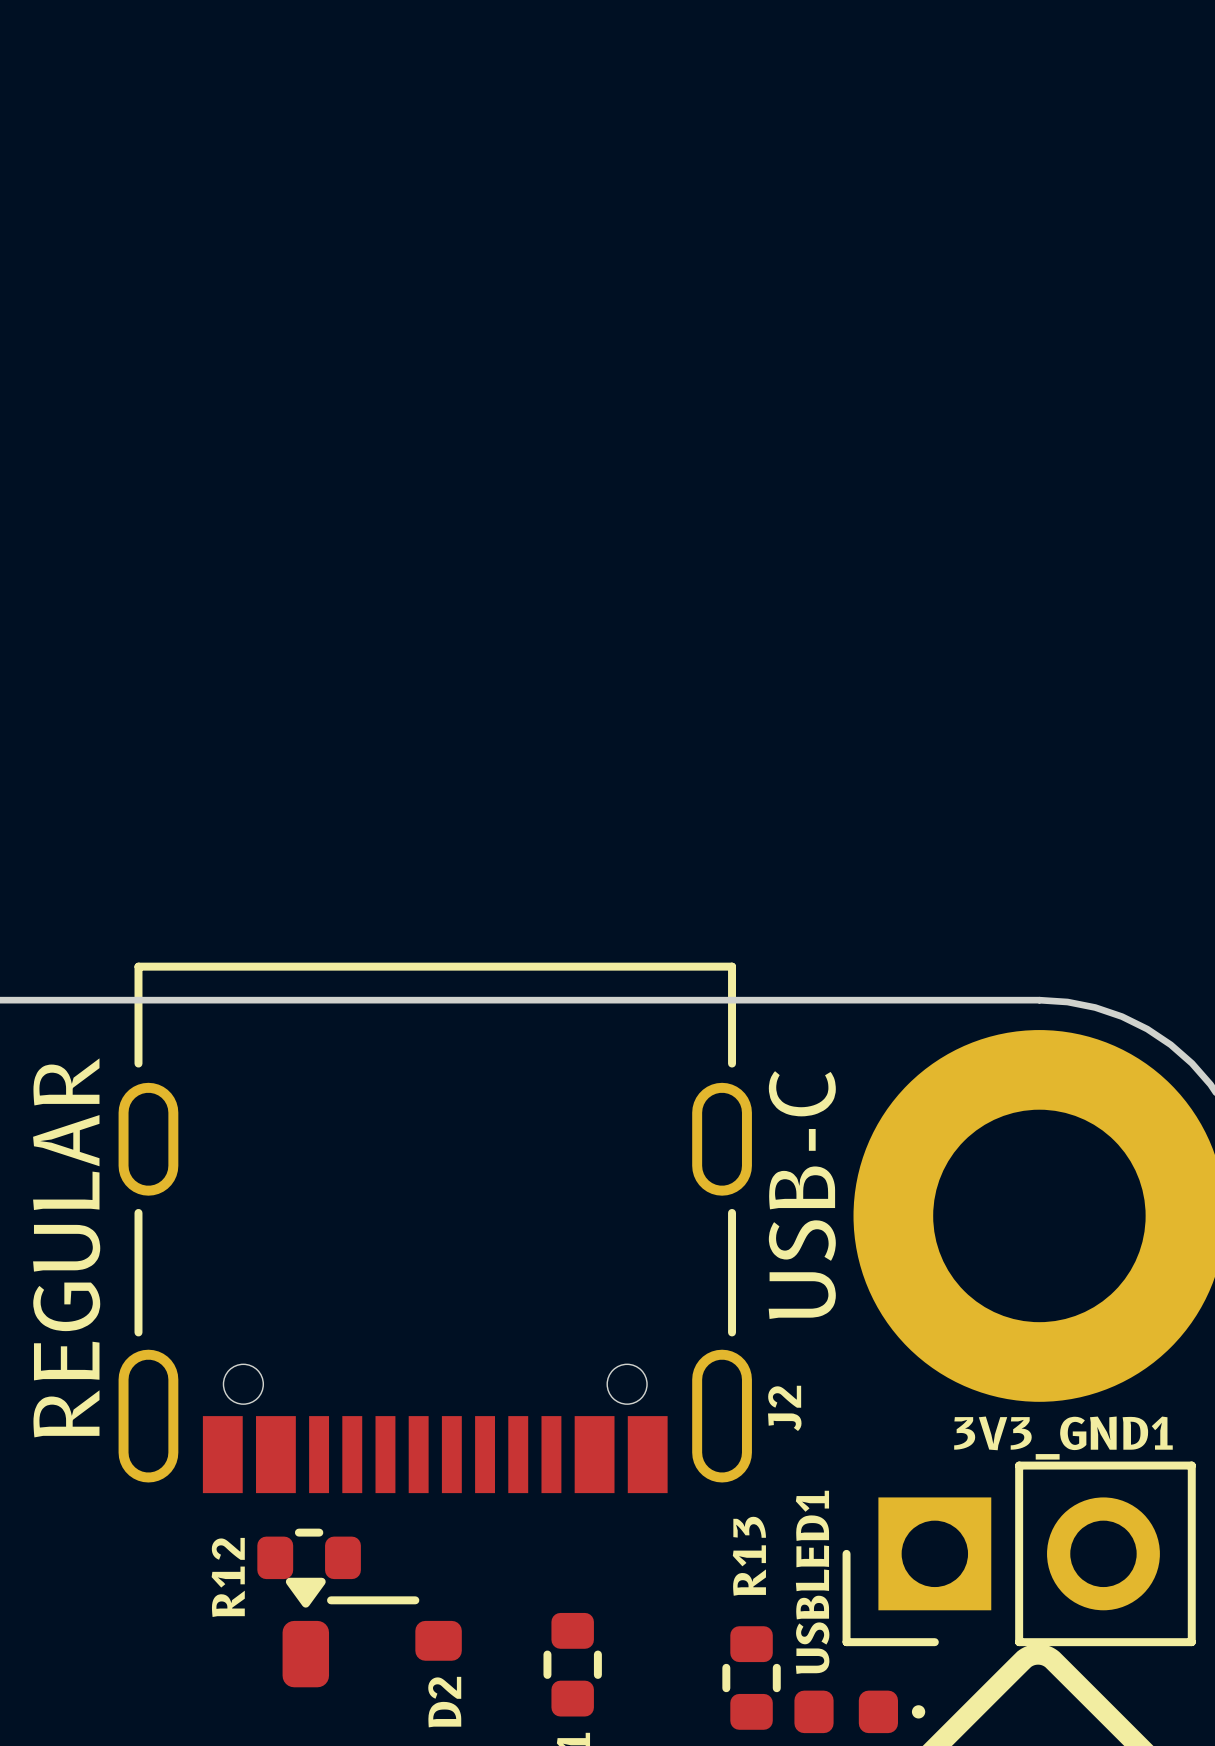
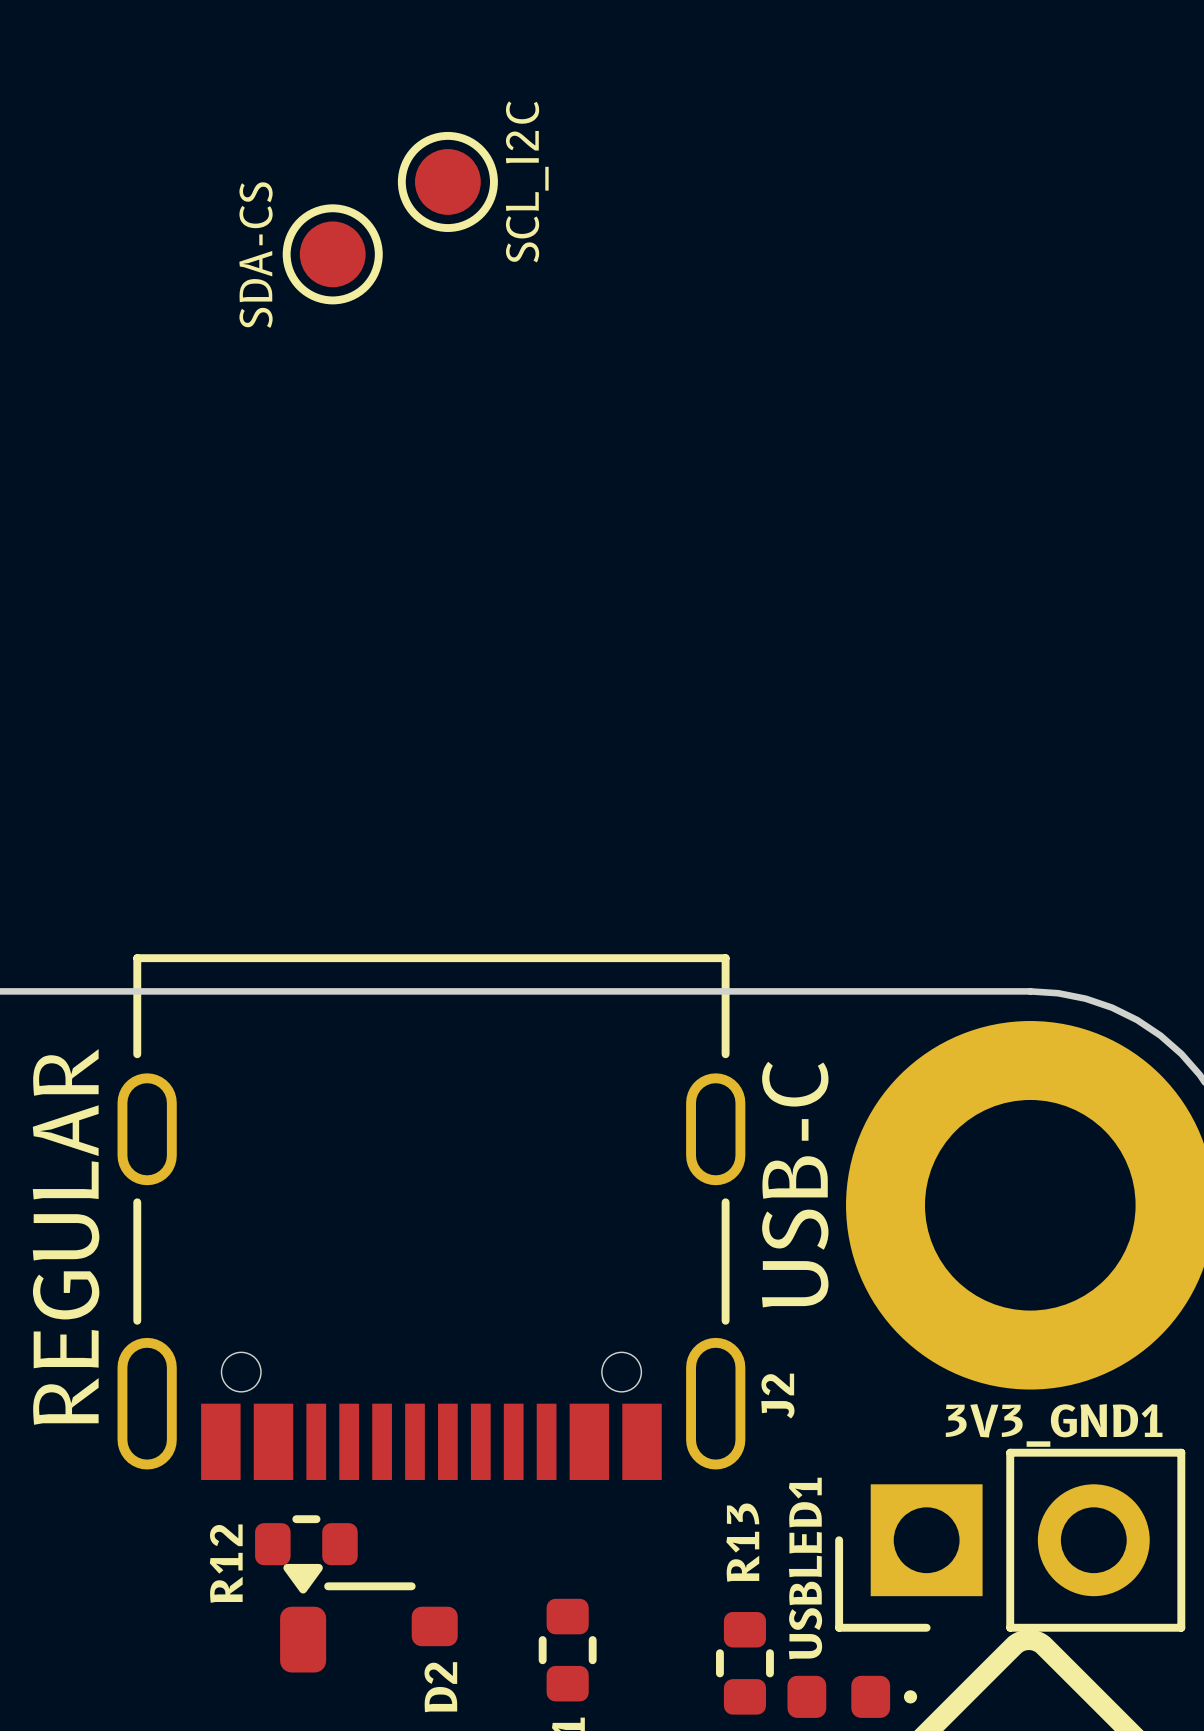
part: none -> (447, 181)
part: none -> (332, 254)

